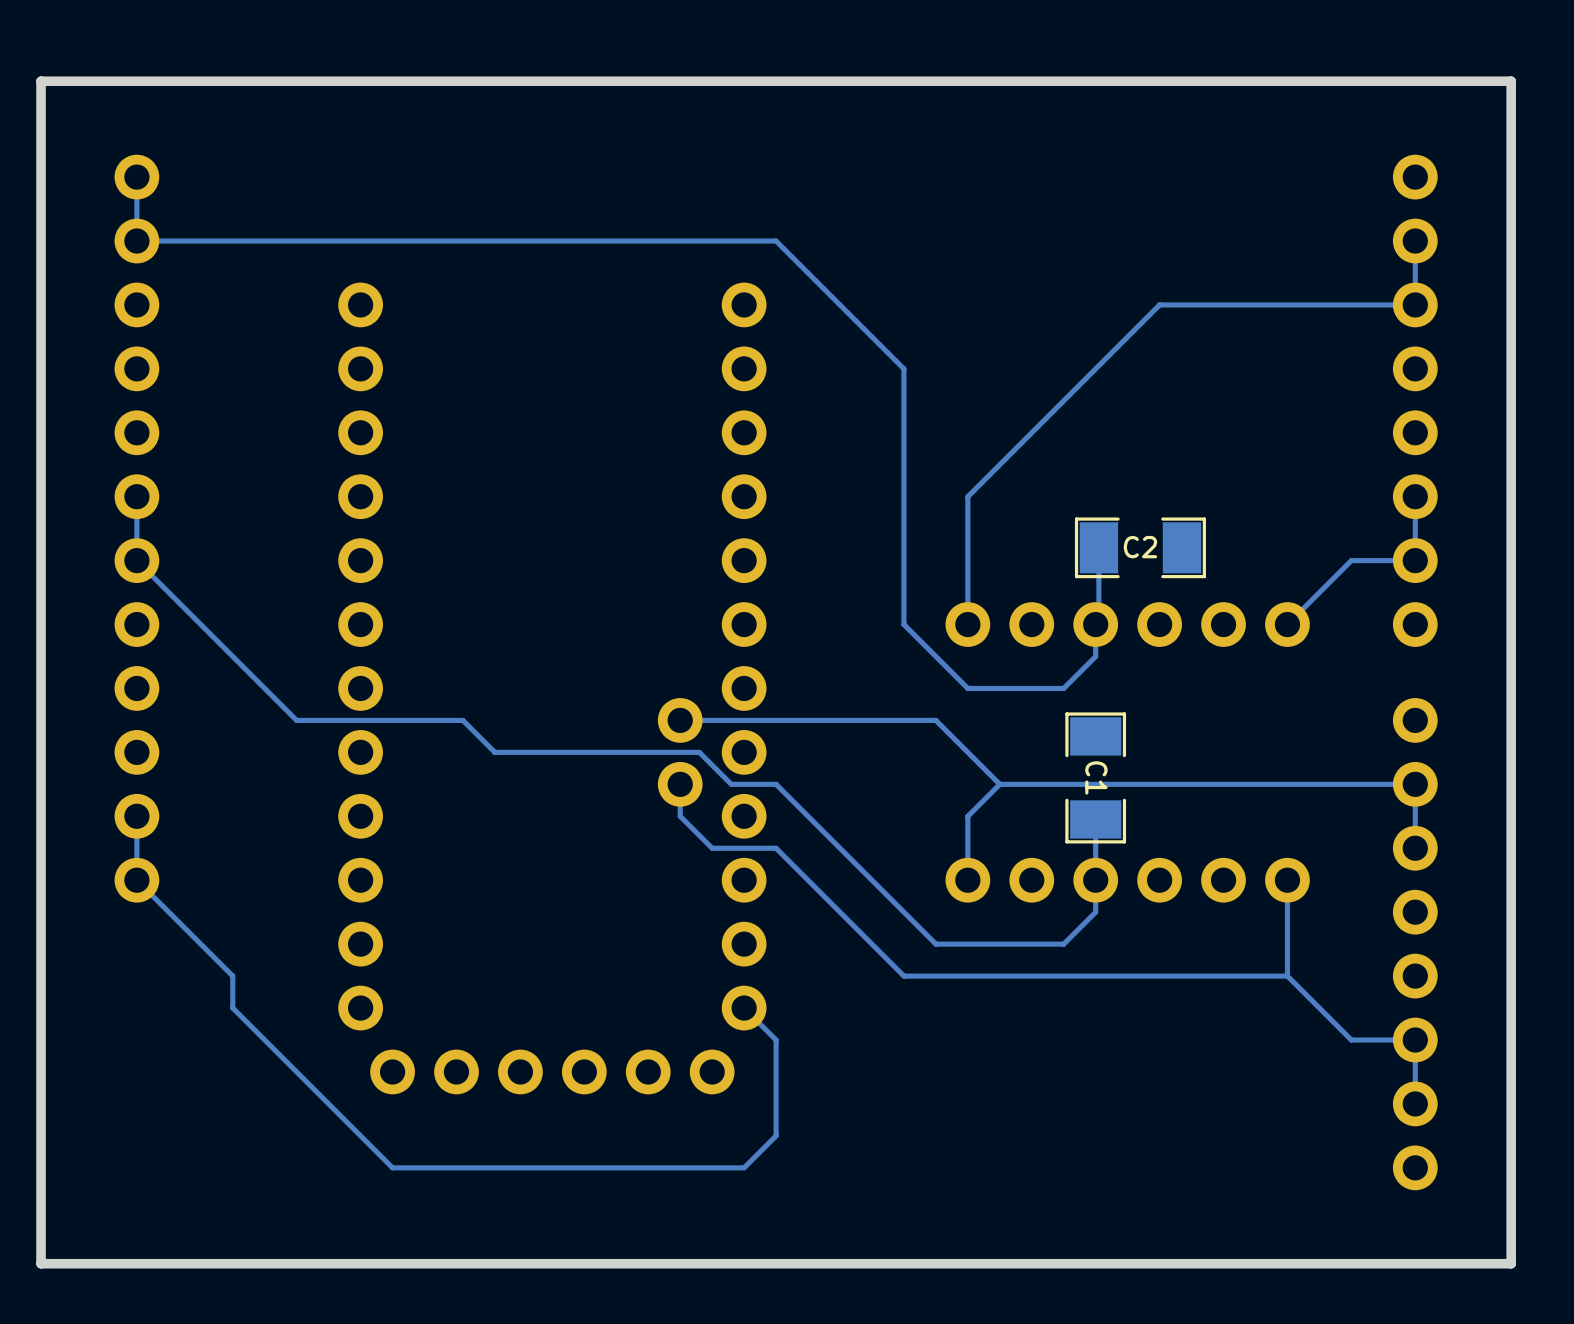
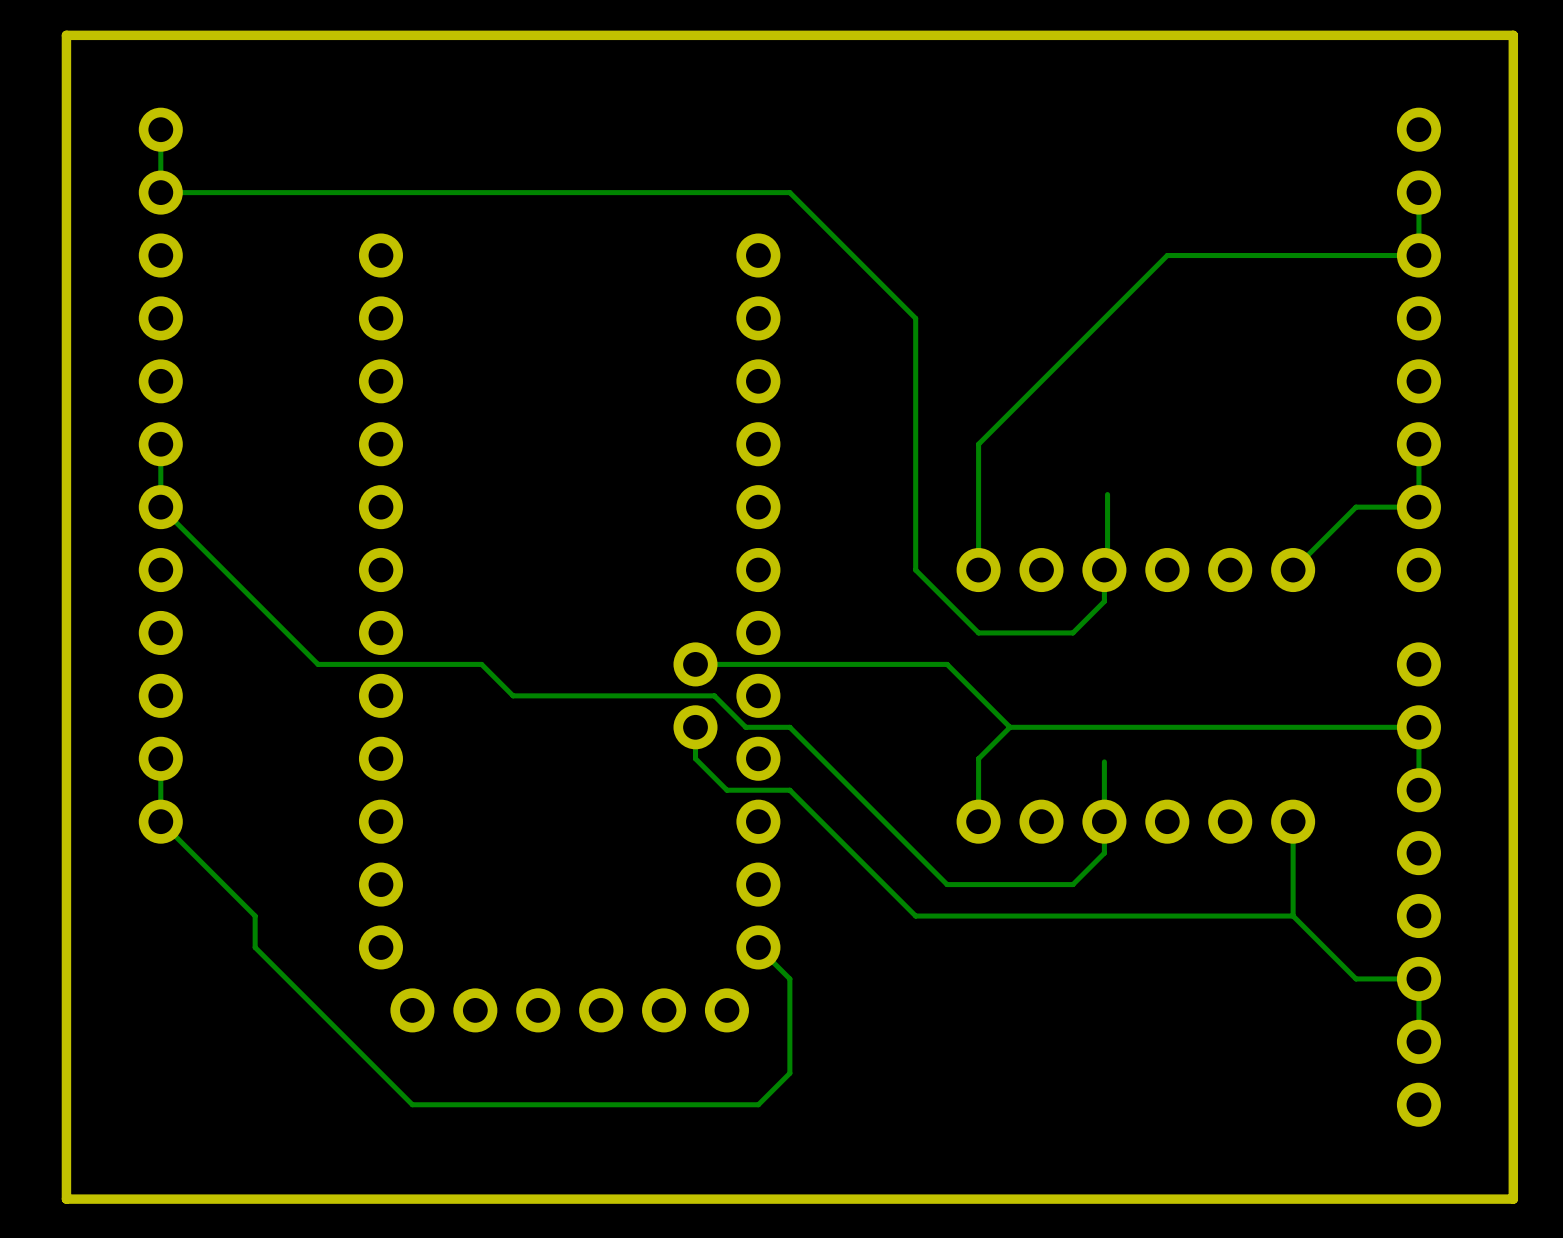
C2: (1140, 547) -> none
C1: (1095, 777) -> none

